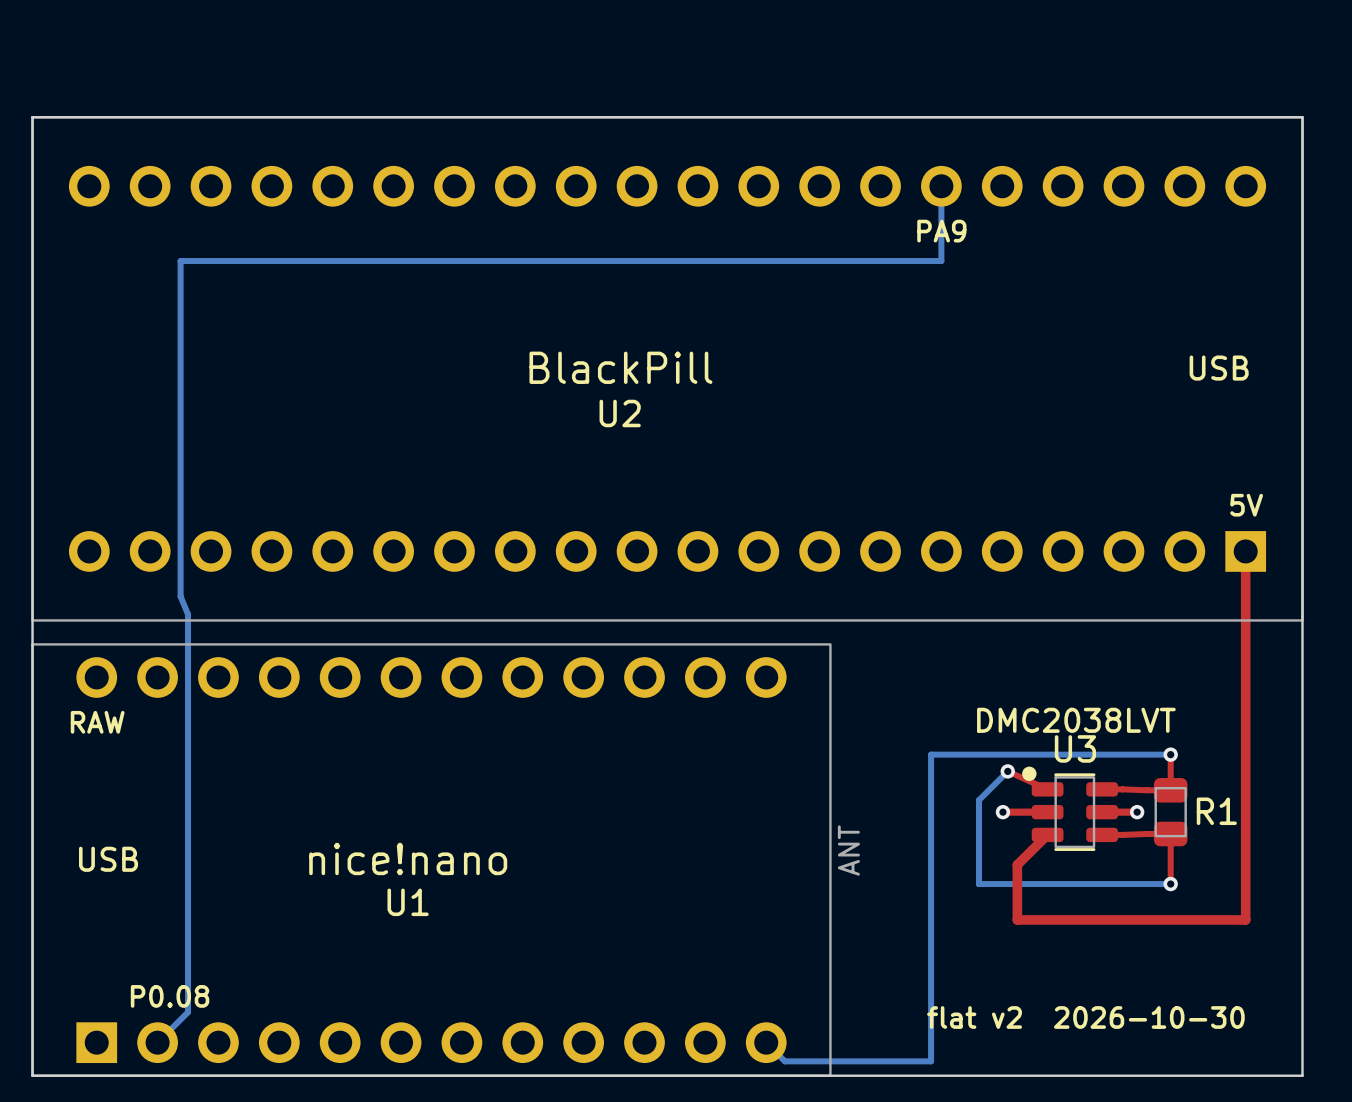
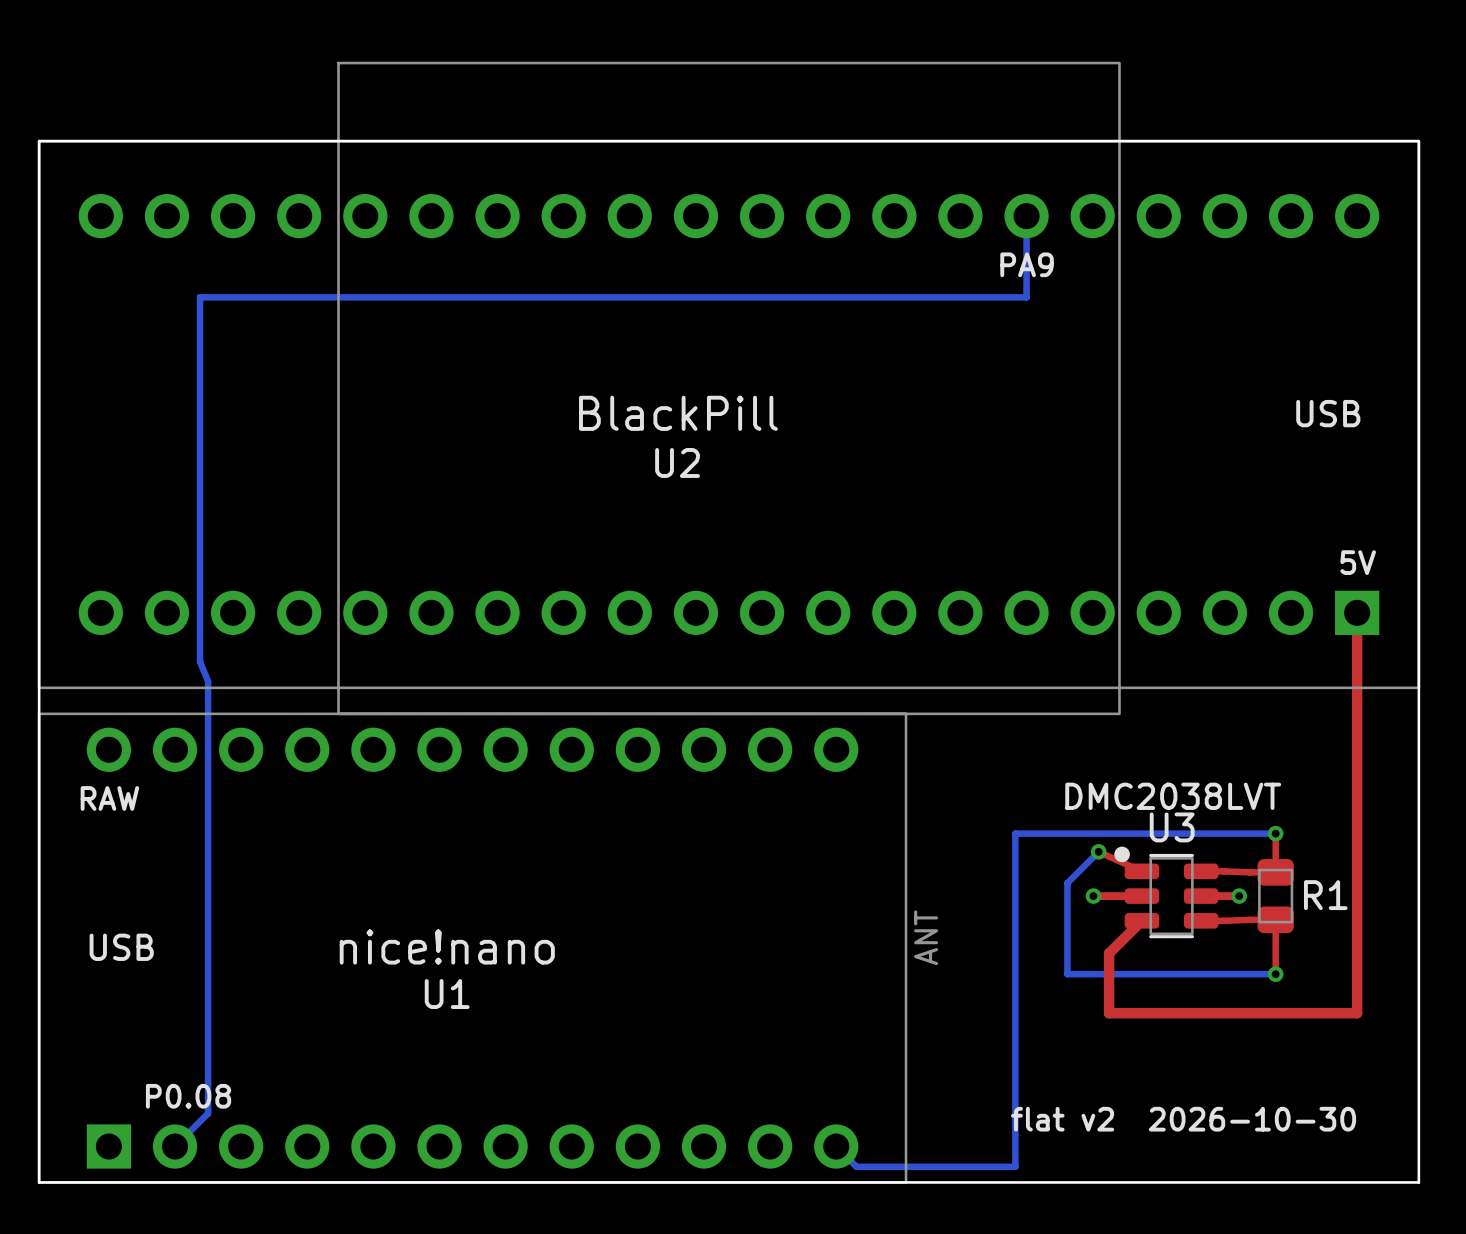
drawing: none -> [337, 61, 1121, 716]

